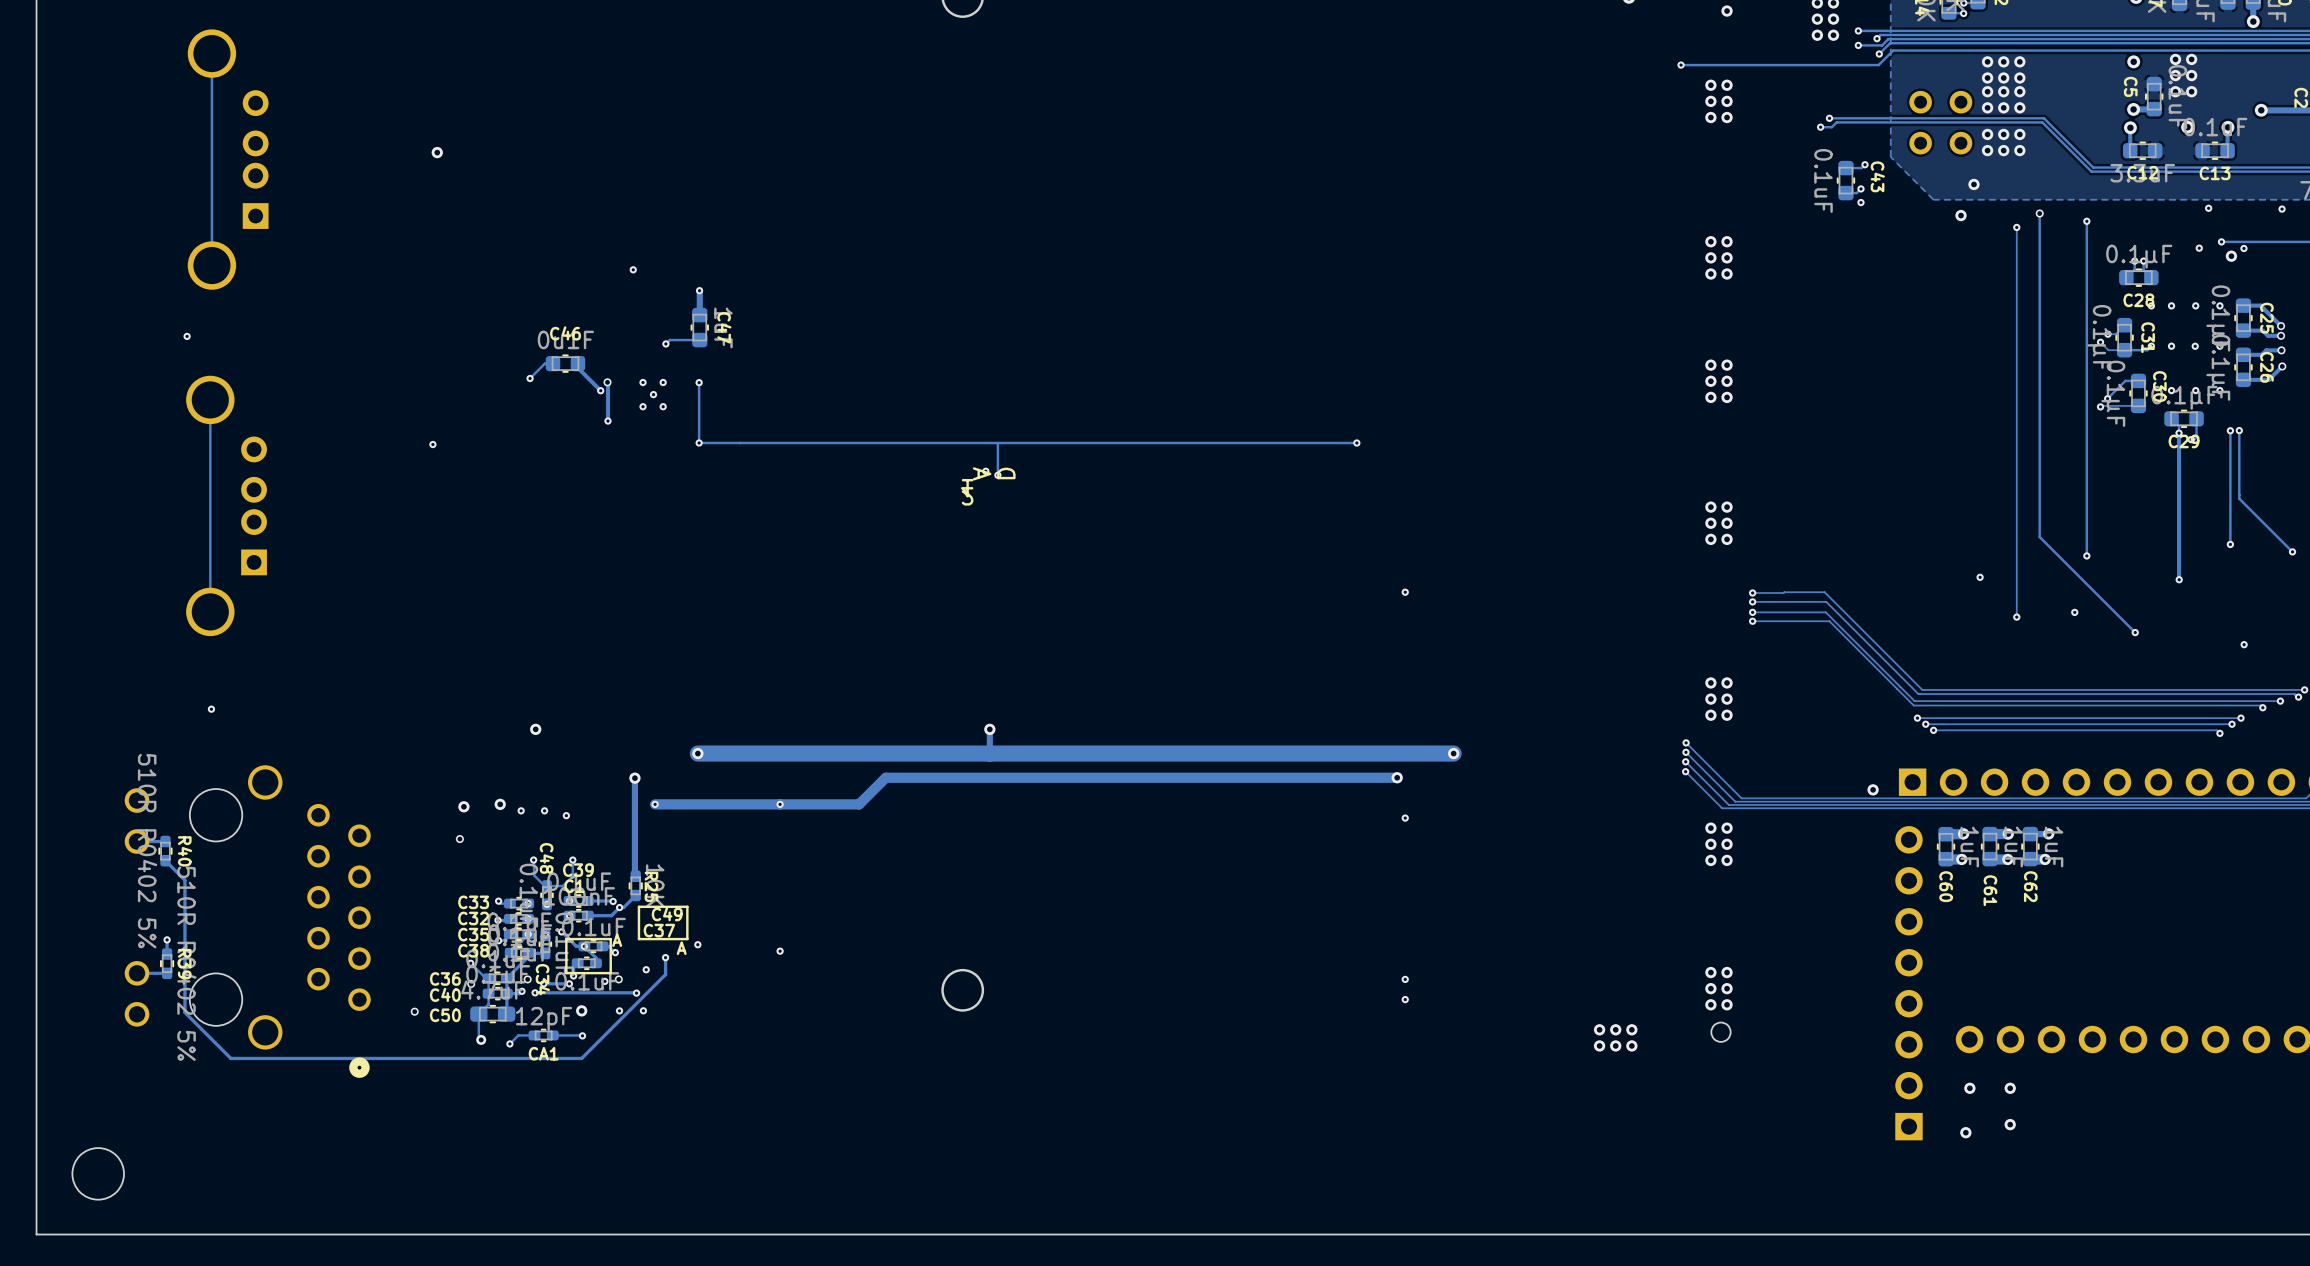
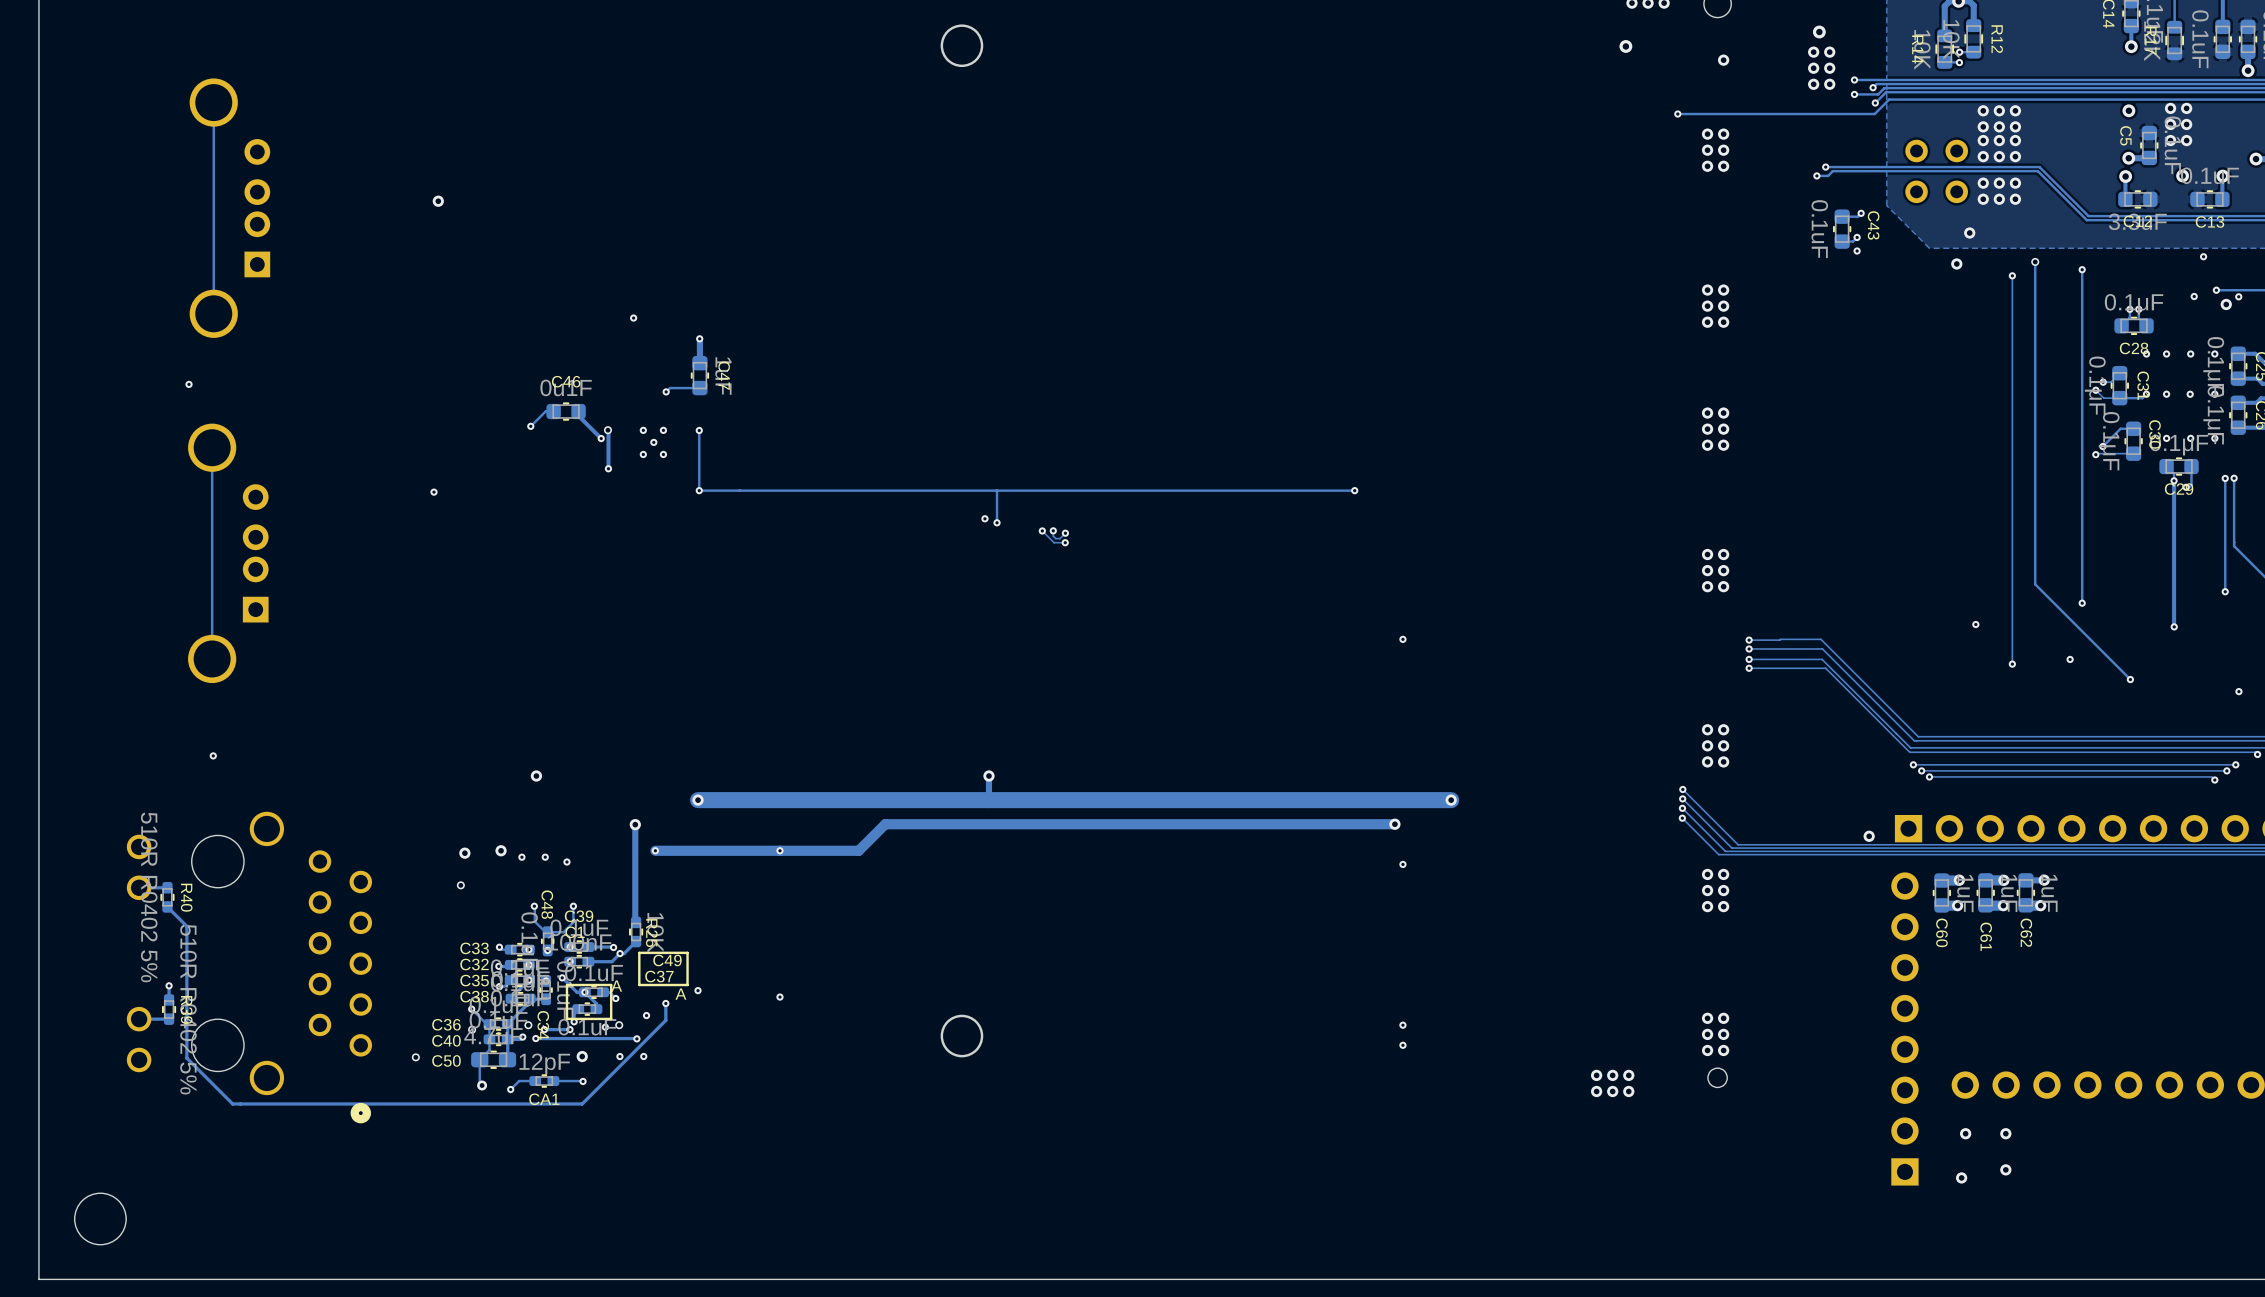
track: none -> (1042, 530) (1054, 542) (1065, 542)
via: none -> (1042, 530)
track: none -> (1053, 530) (1053, 536) (1055, 538) (1060, 538) (1065, 533)
via: none -> (1053, 530)
via: none -> (1065, 533)
part: (988, 486) -> none
via: none -> (1065, 542)

